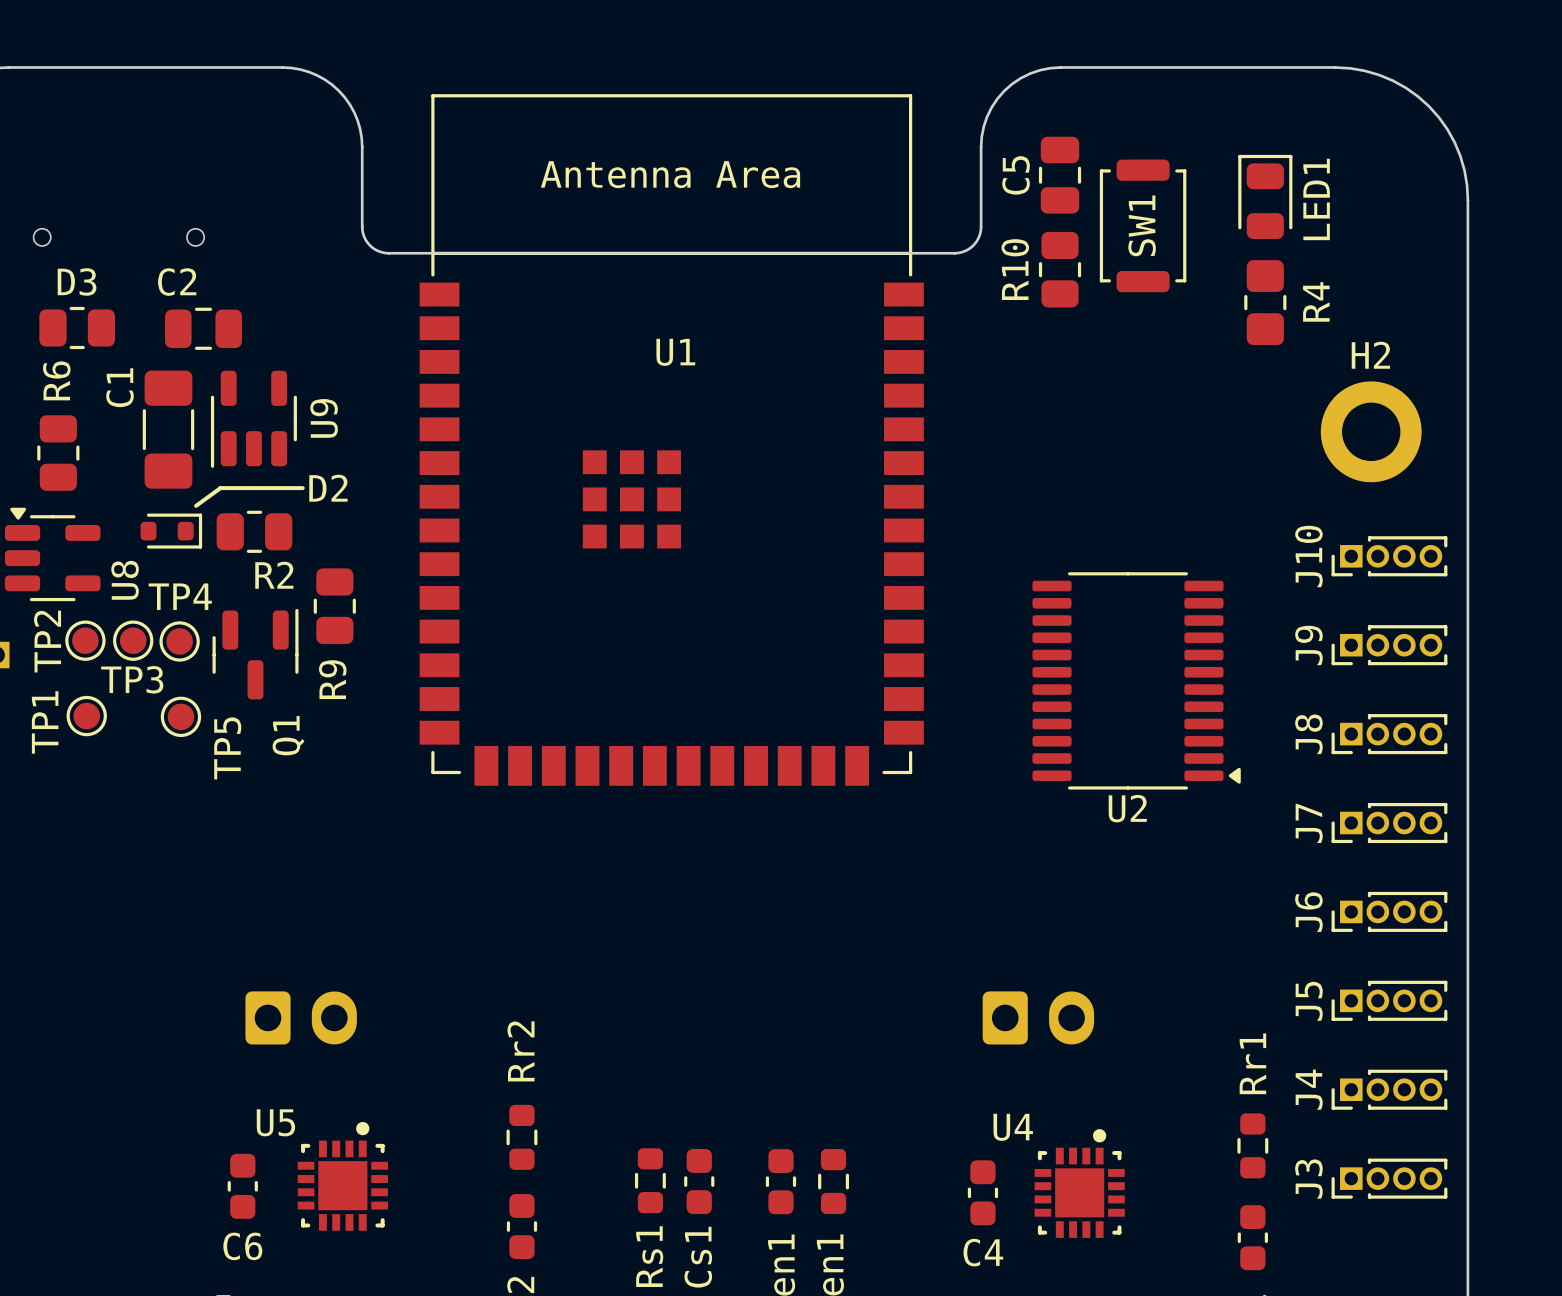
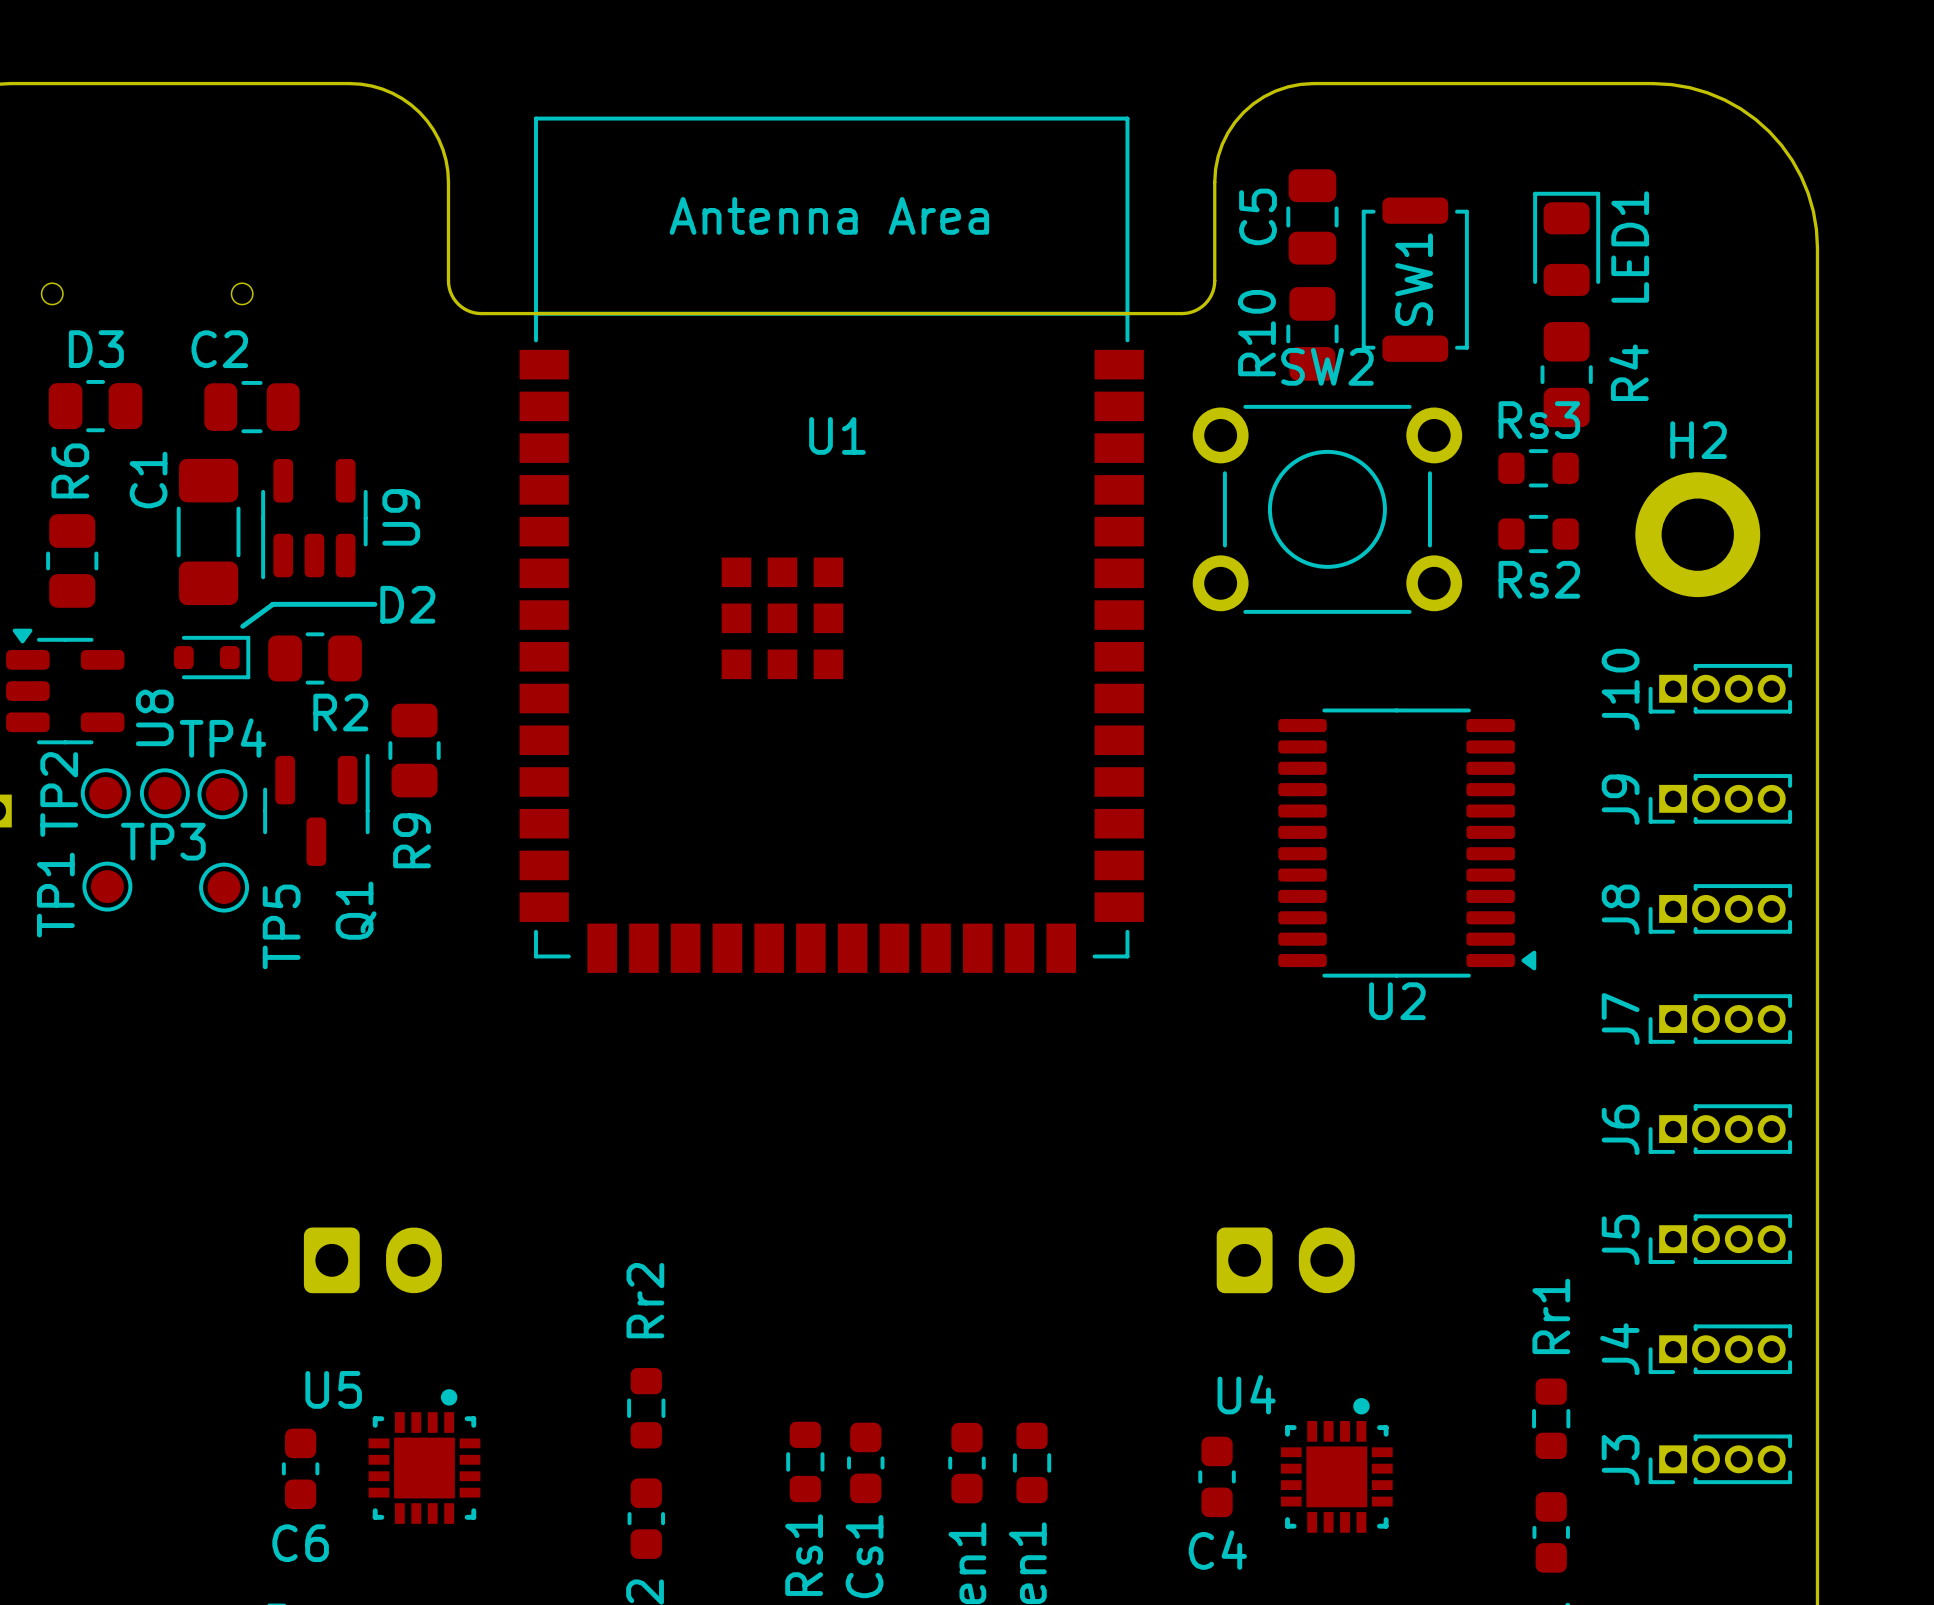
Rs3: none -> (1538, 468)
SW2: none -> (1327, 509)
Rs2: none -> (1538, 534)

